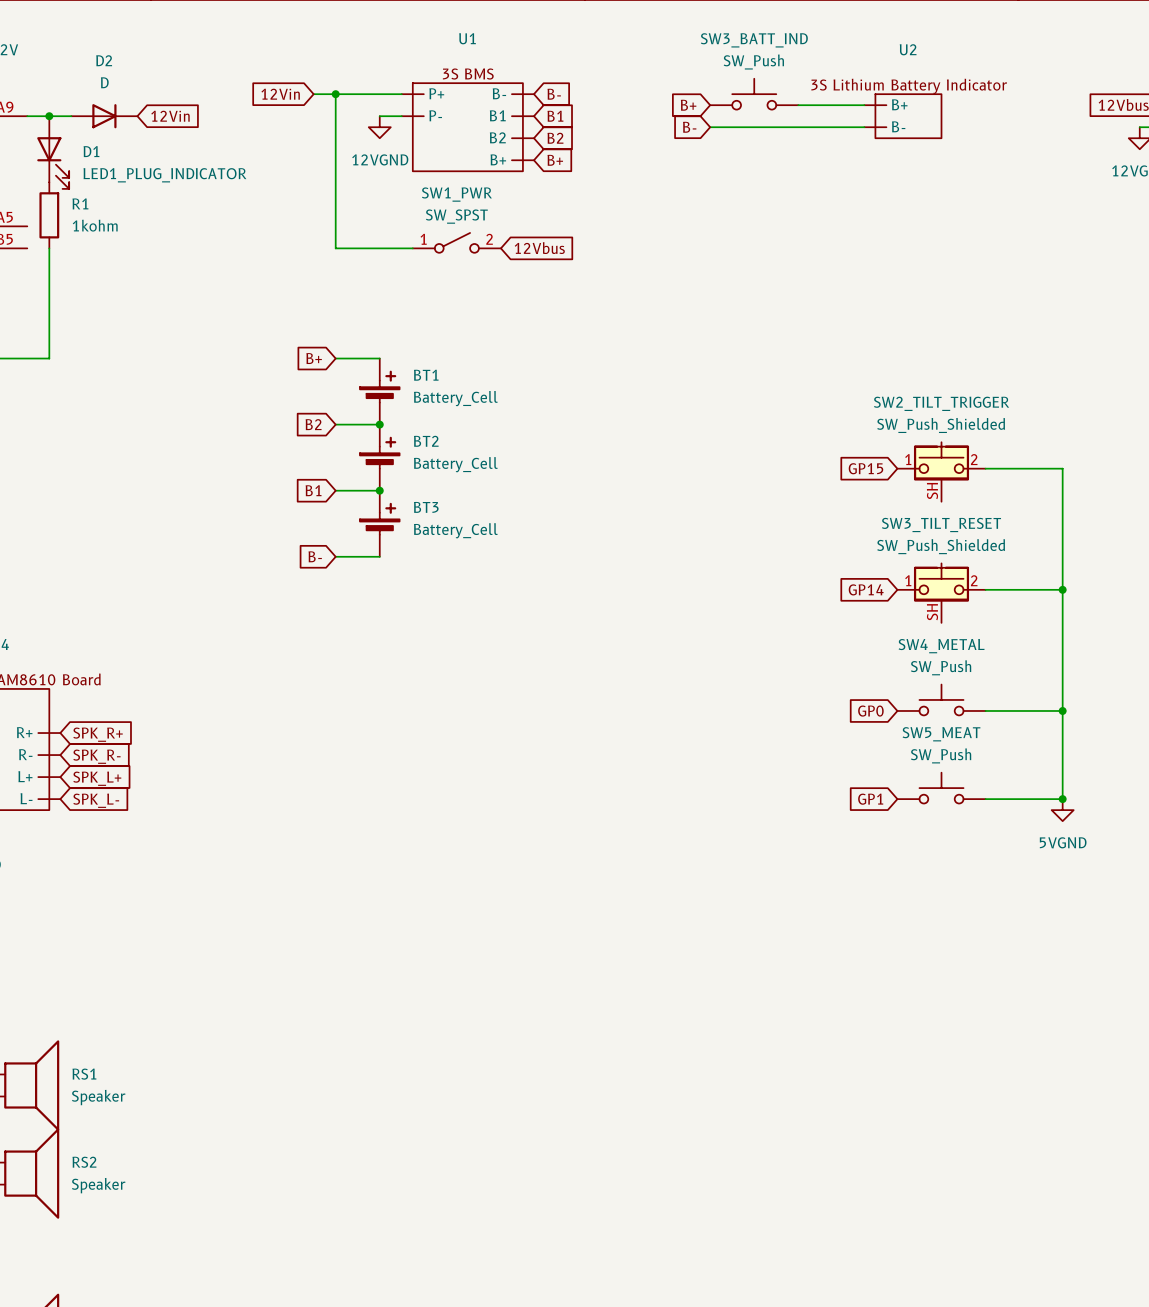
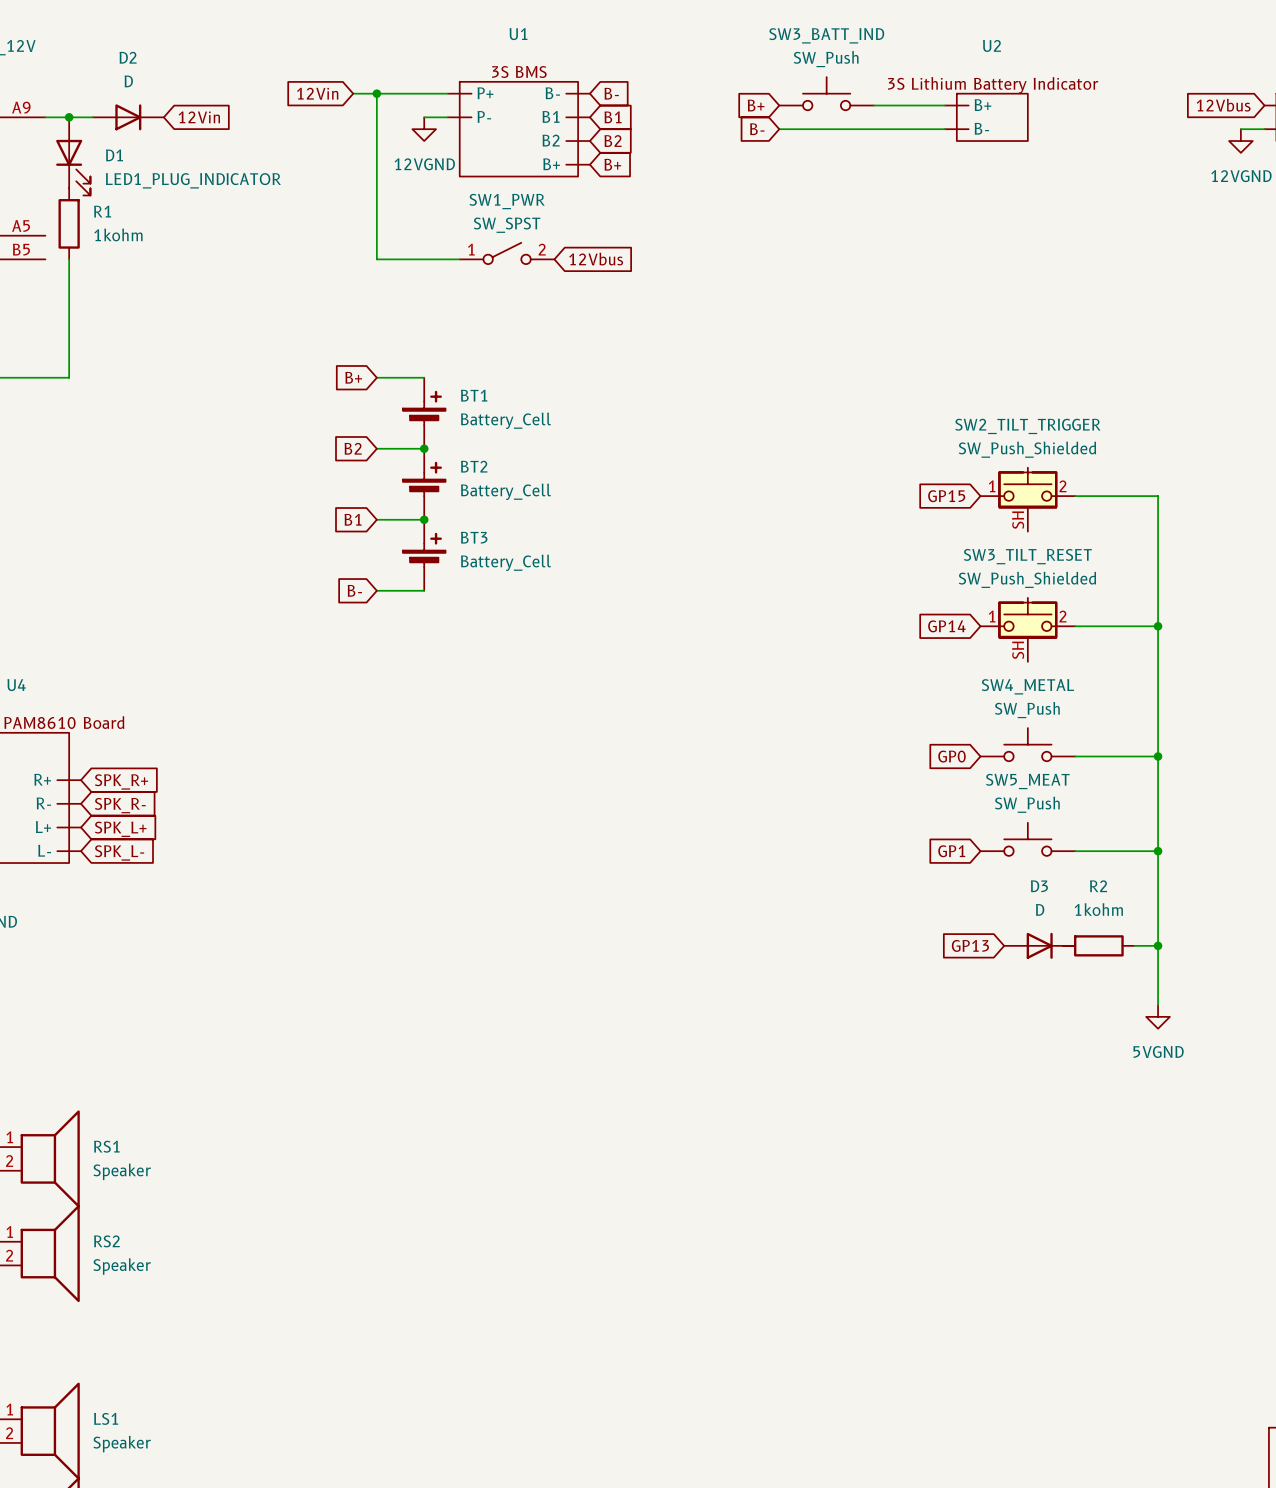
wire: none -> (1158, 851) (1158, 1005)
power symbol position: 5VGND (1062, 810) -> 5VGND (1158, 1016)
global label: none -> GP13 (970, 945)
D3: none -> D (1039, 945)
R2: none -> 1kohm (1098, 945)
wire: none -> (1134, 945) (1158, 945)
junction: none -> (1158, 945)

